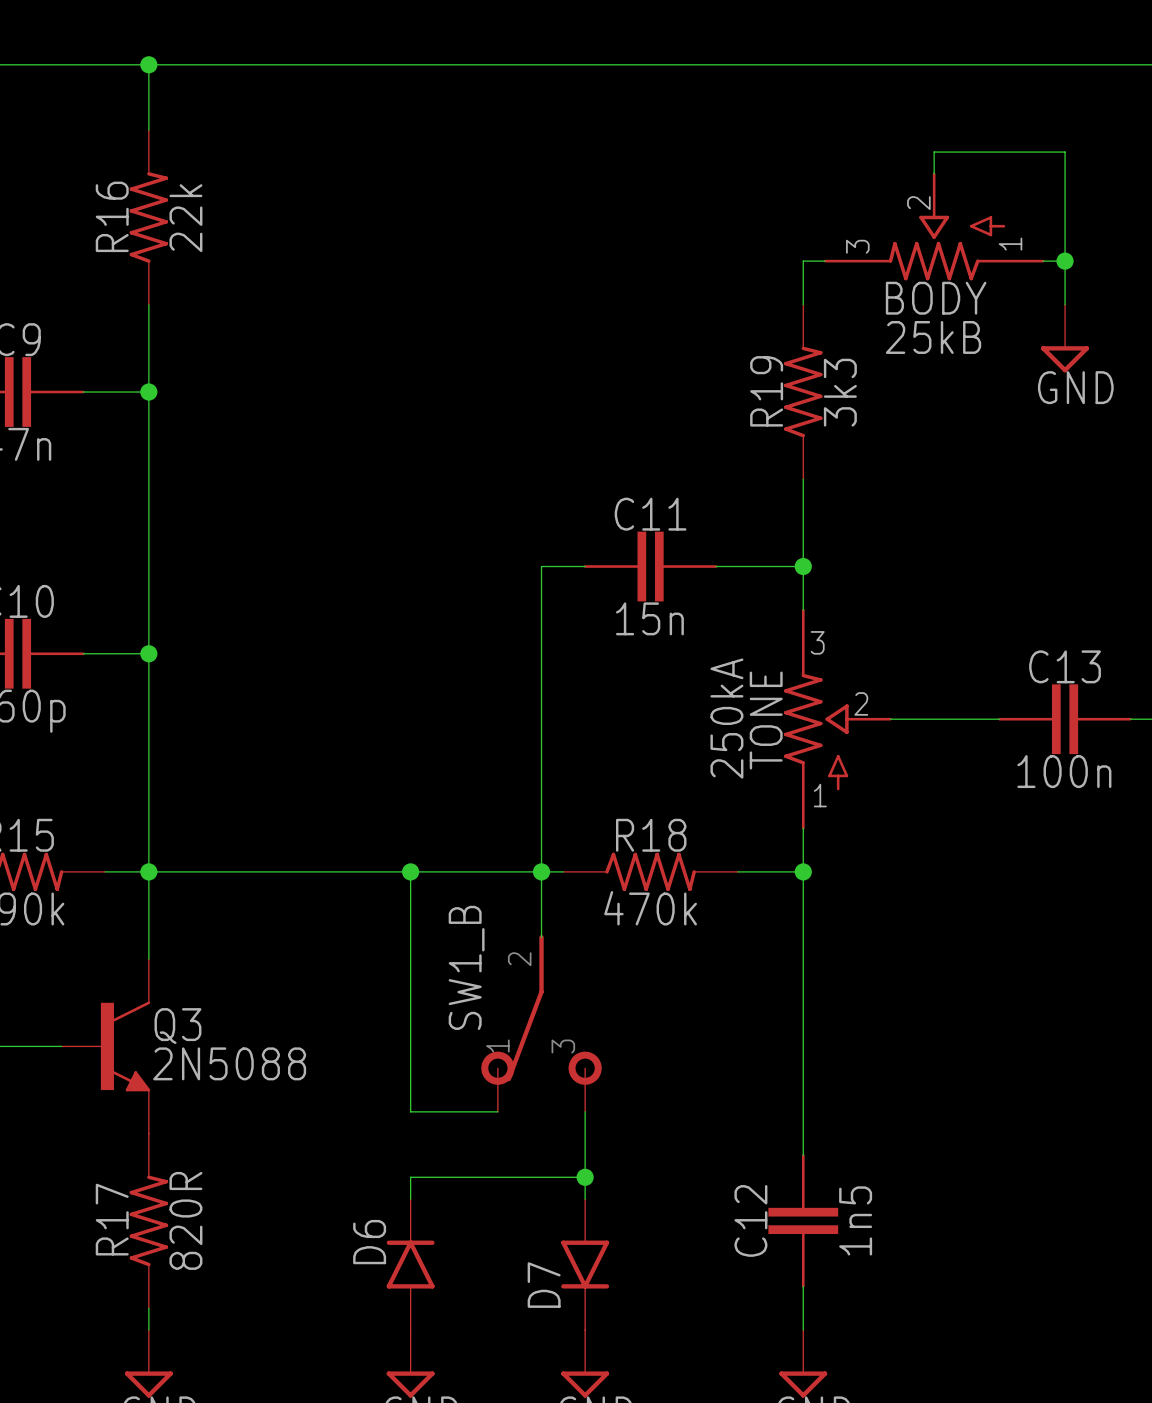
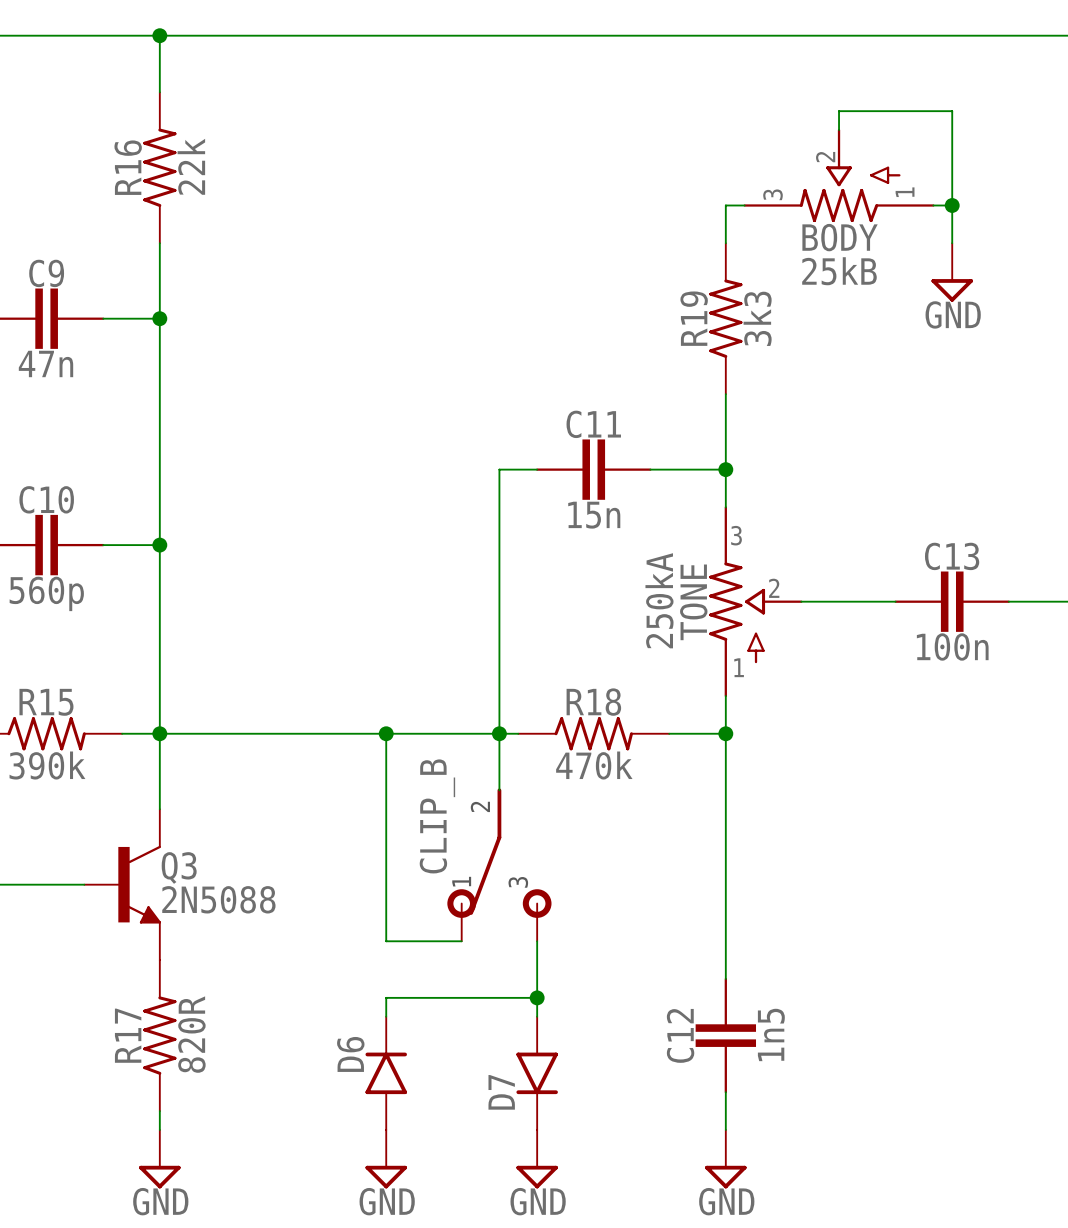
SW1_B name: SW1_B (466, 967) -> CLIP_B (437, 816)

